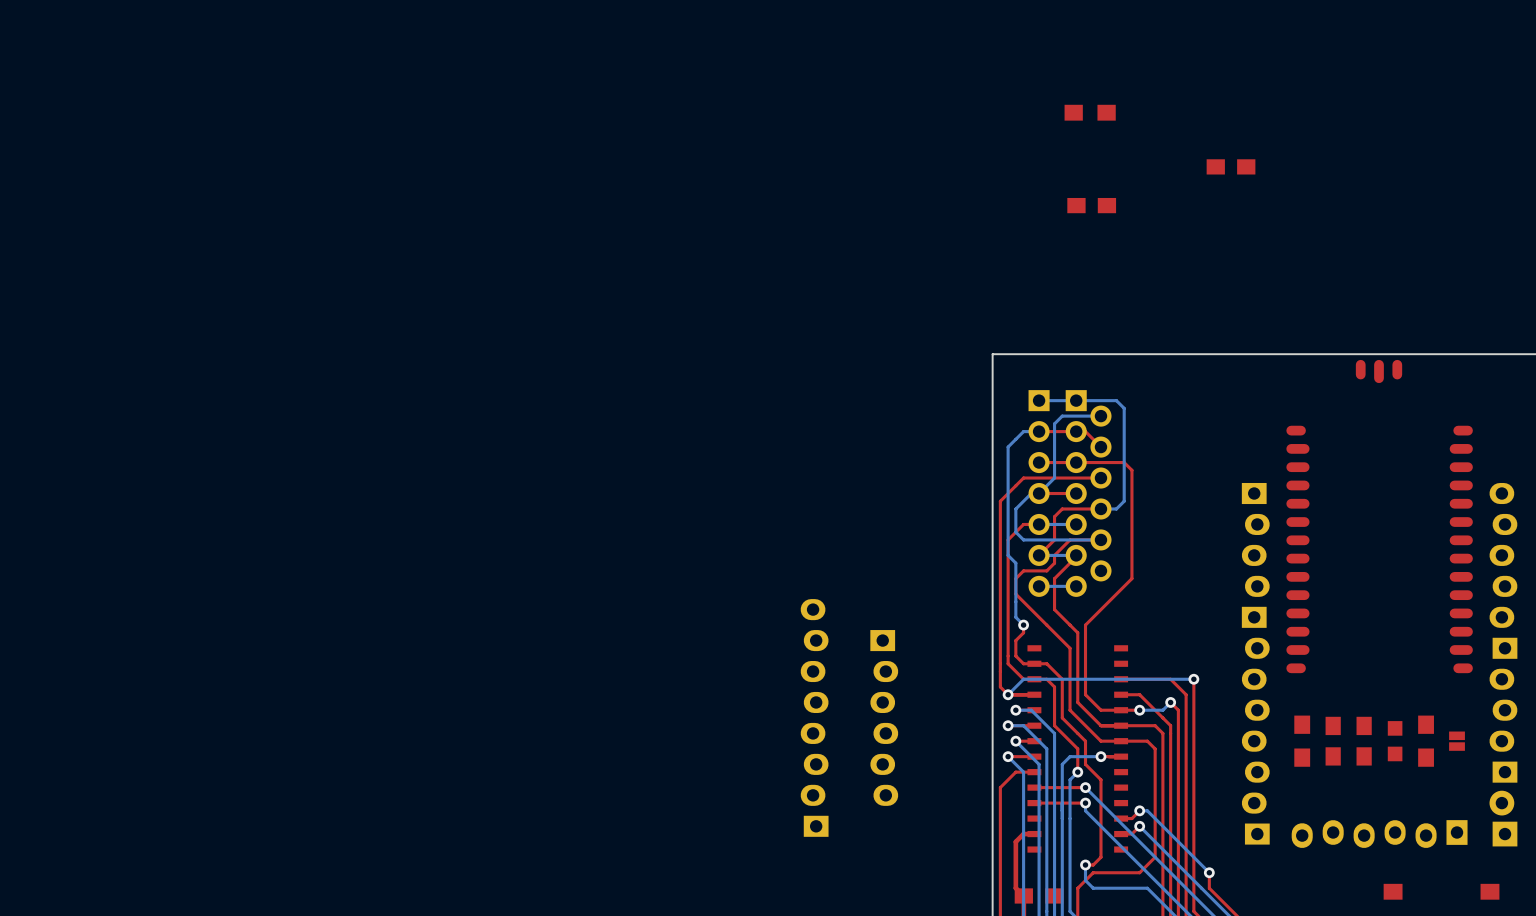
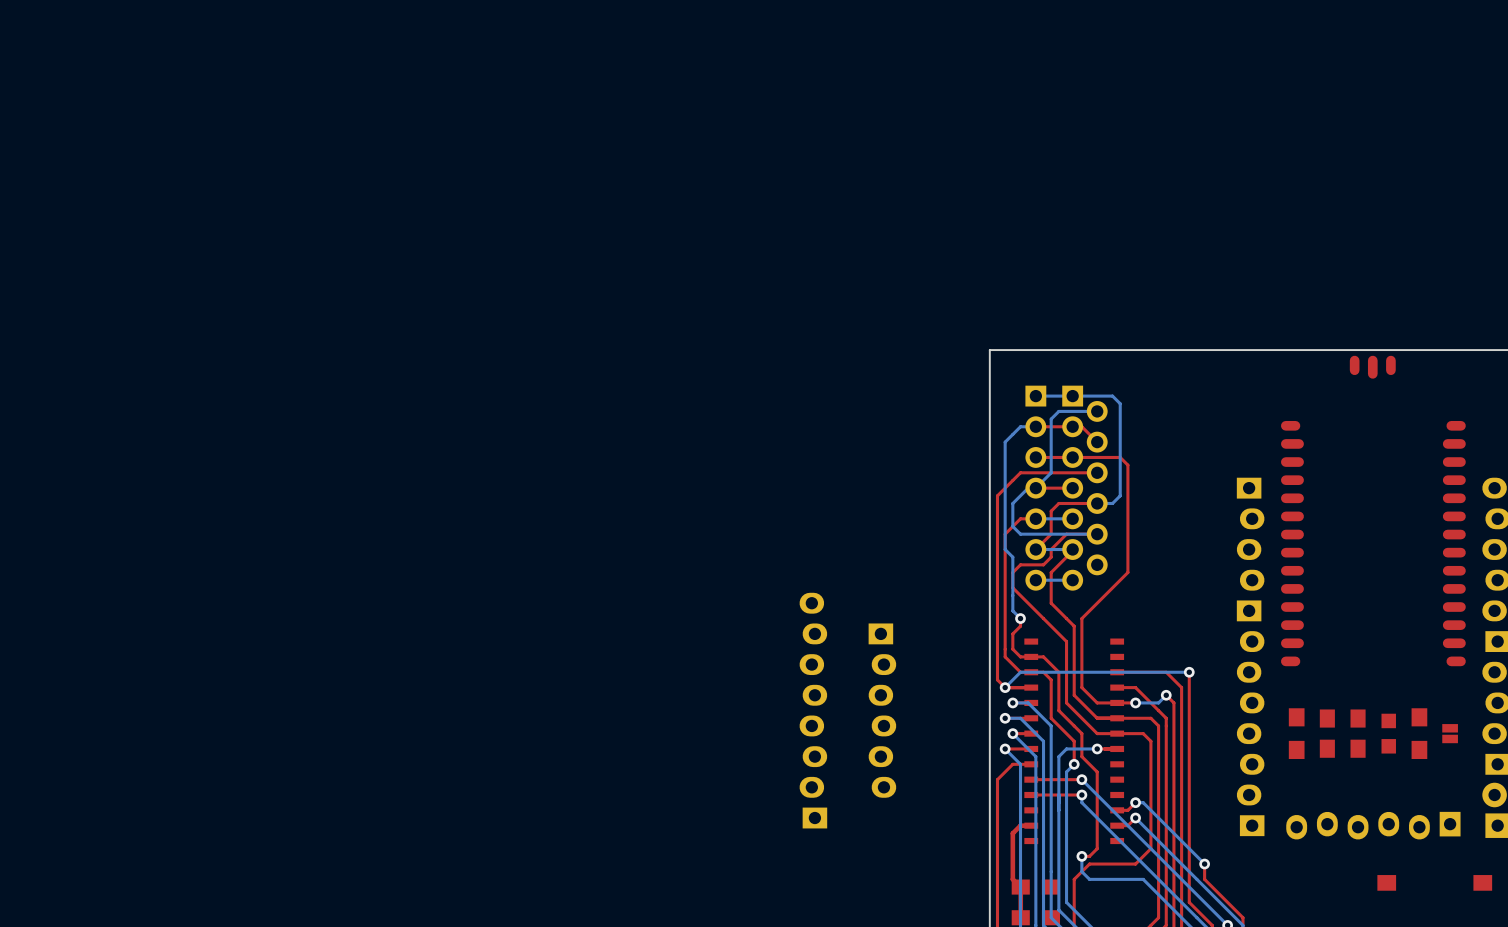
part: (1090, 112) -> none
part: (1231, 166) -> none
part: (1091, 205) -> none

